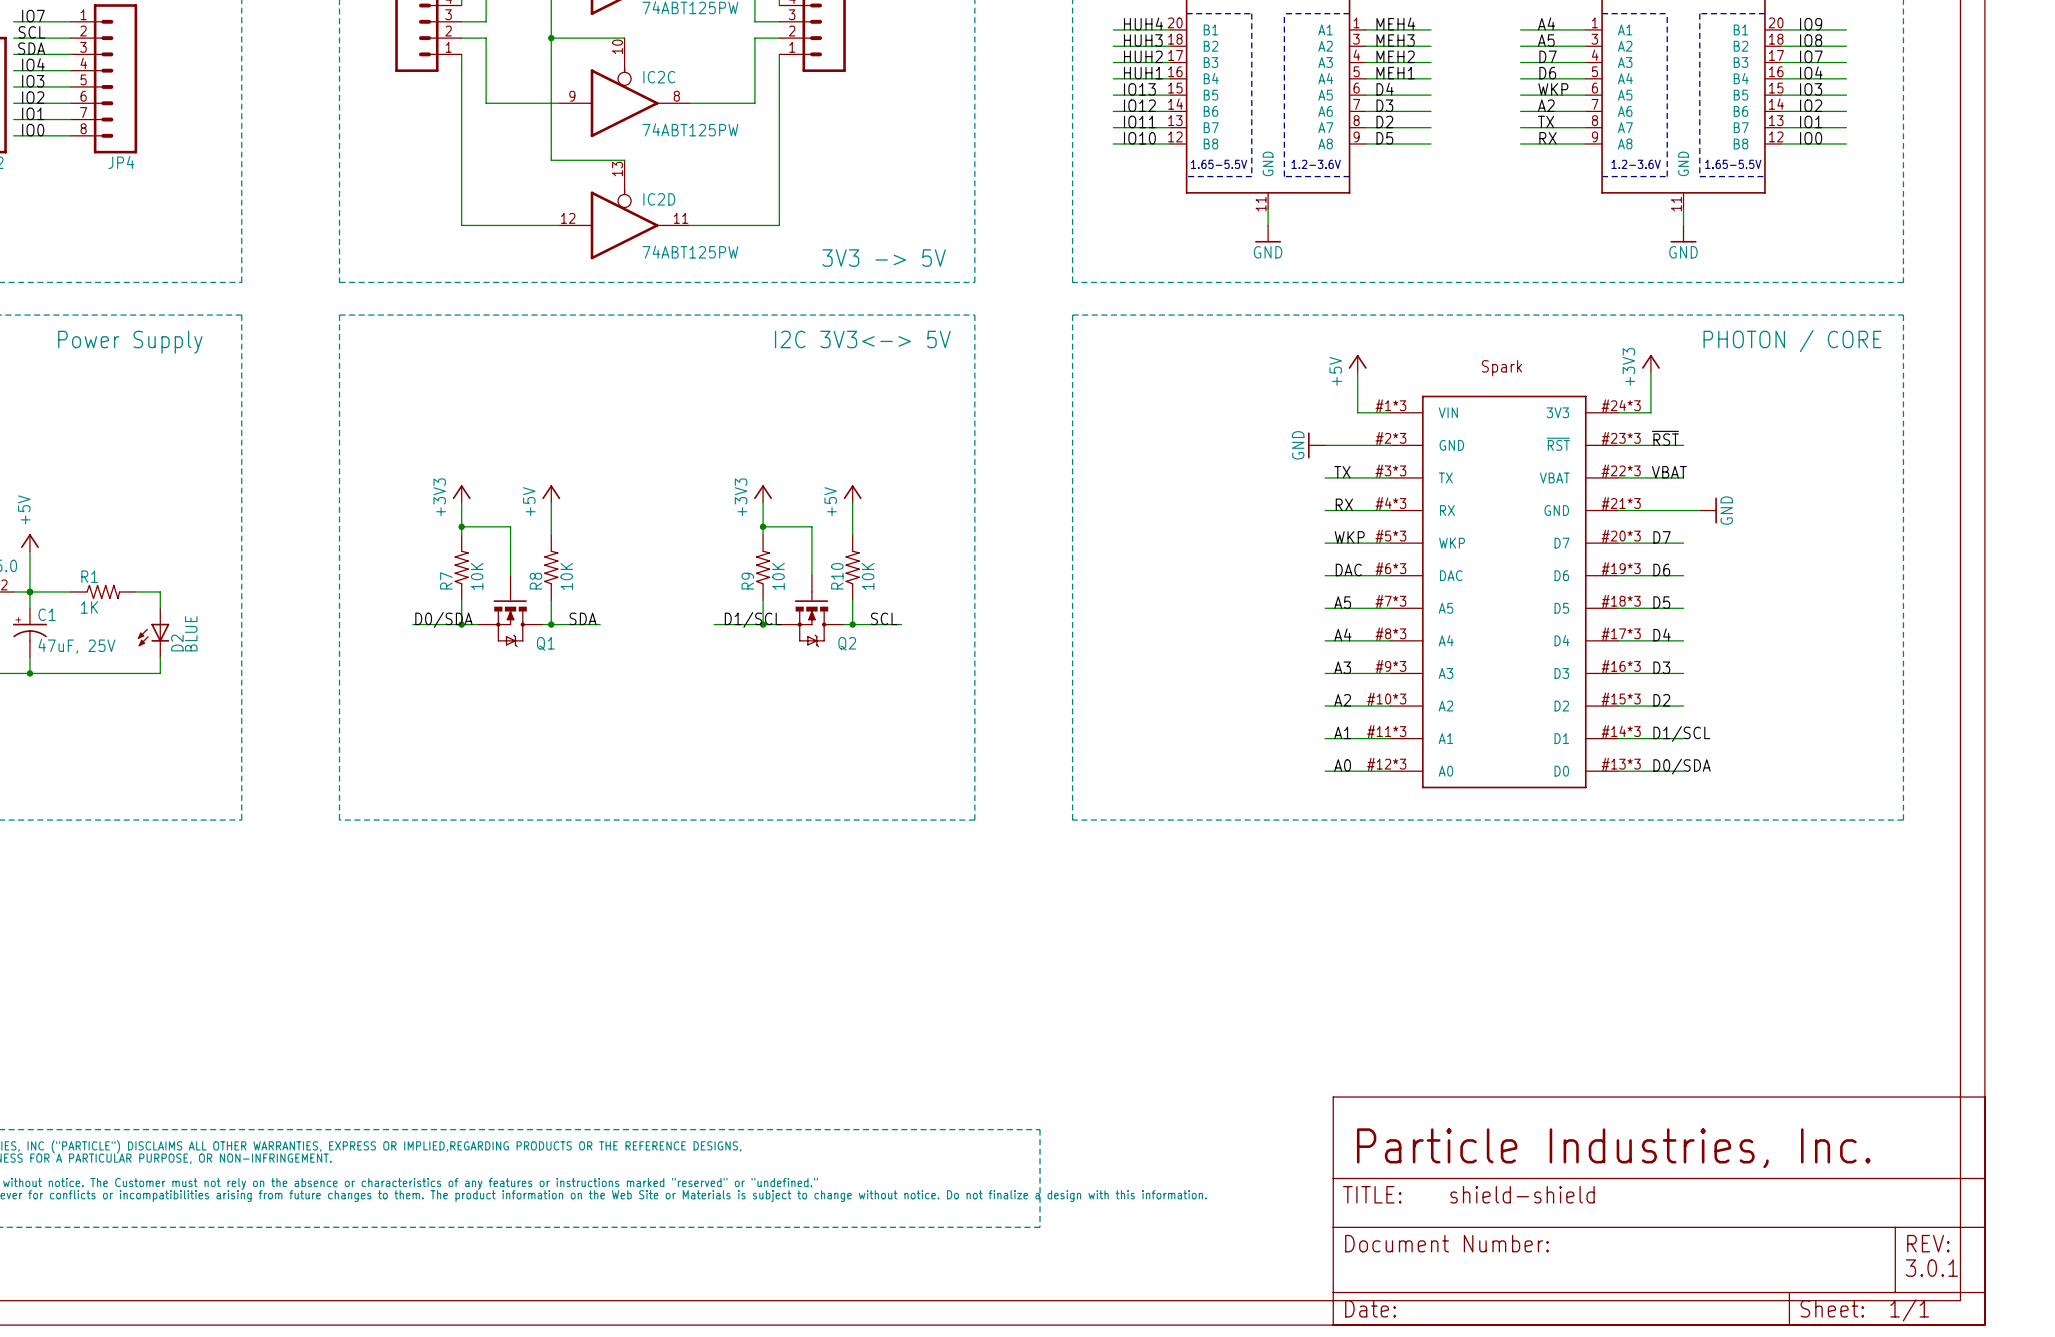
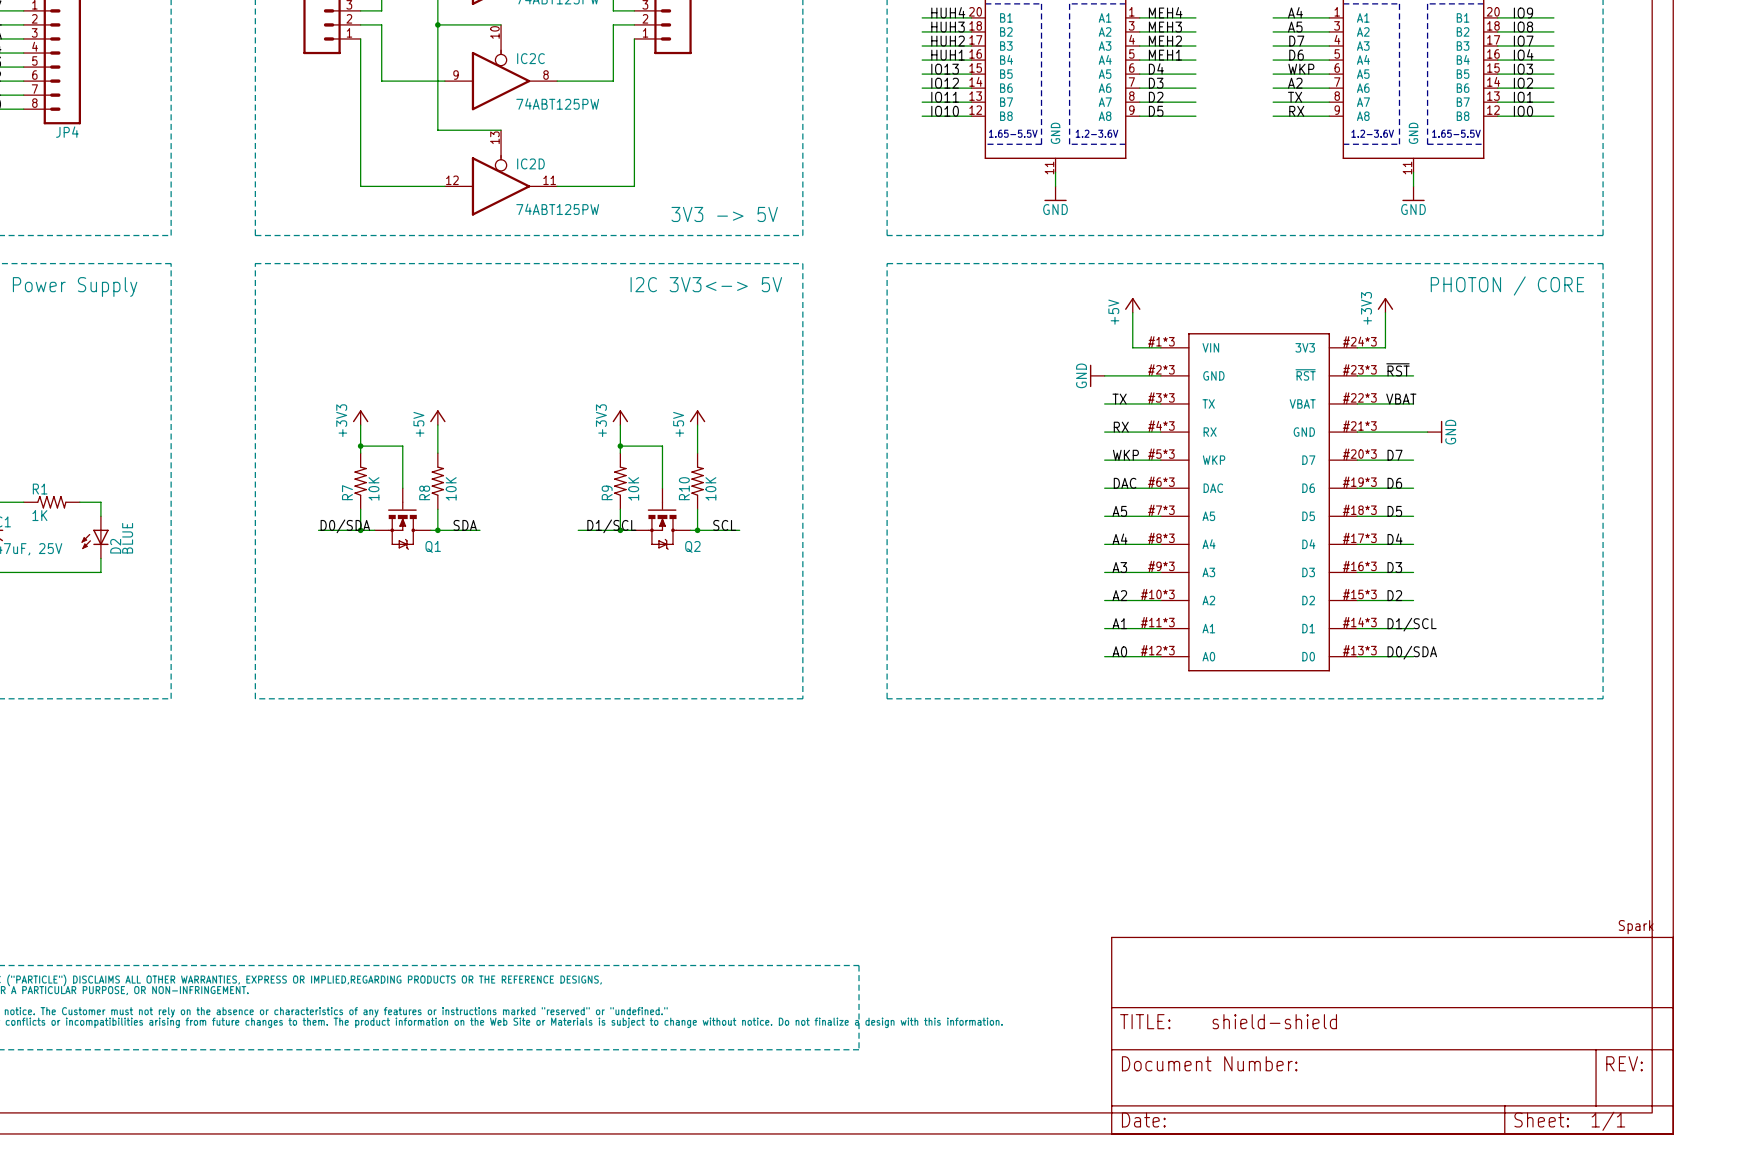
part: (1501, 368) -> none
part: none -> (1636, 927)
text: Particle Industries, Inc. (1613, 1148) -> none
text: 3.0.1 (1931, 1268) -> none

